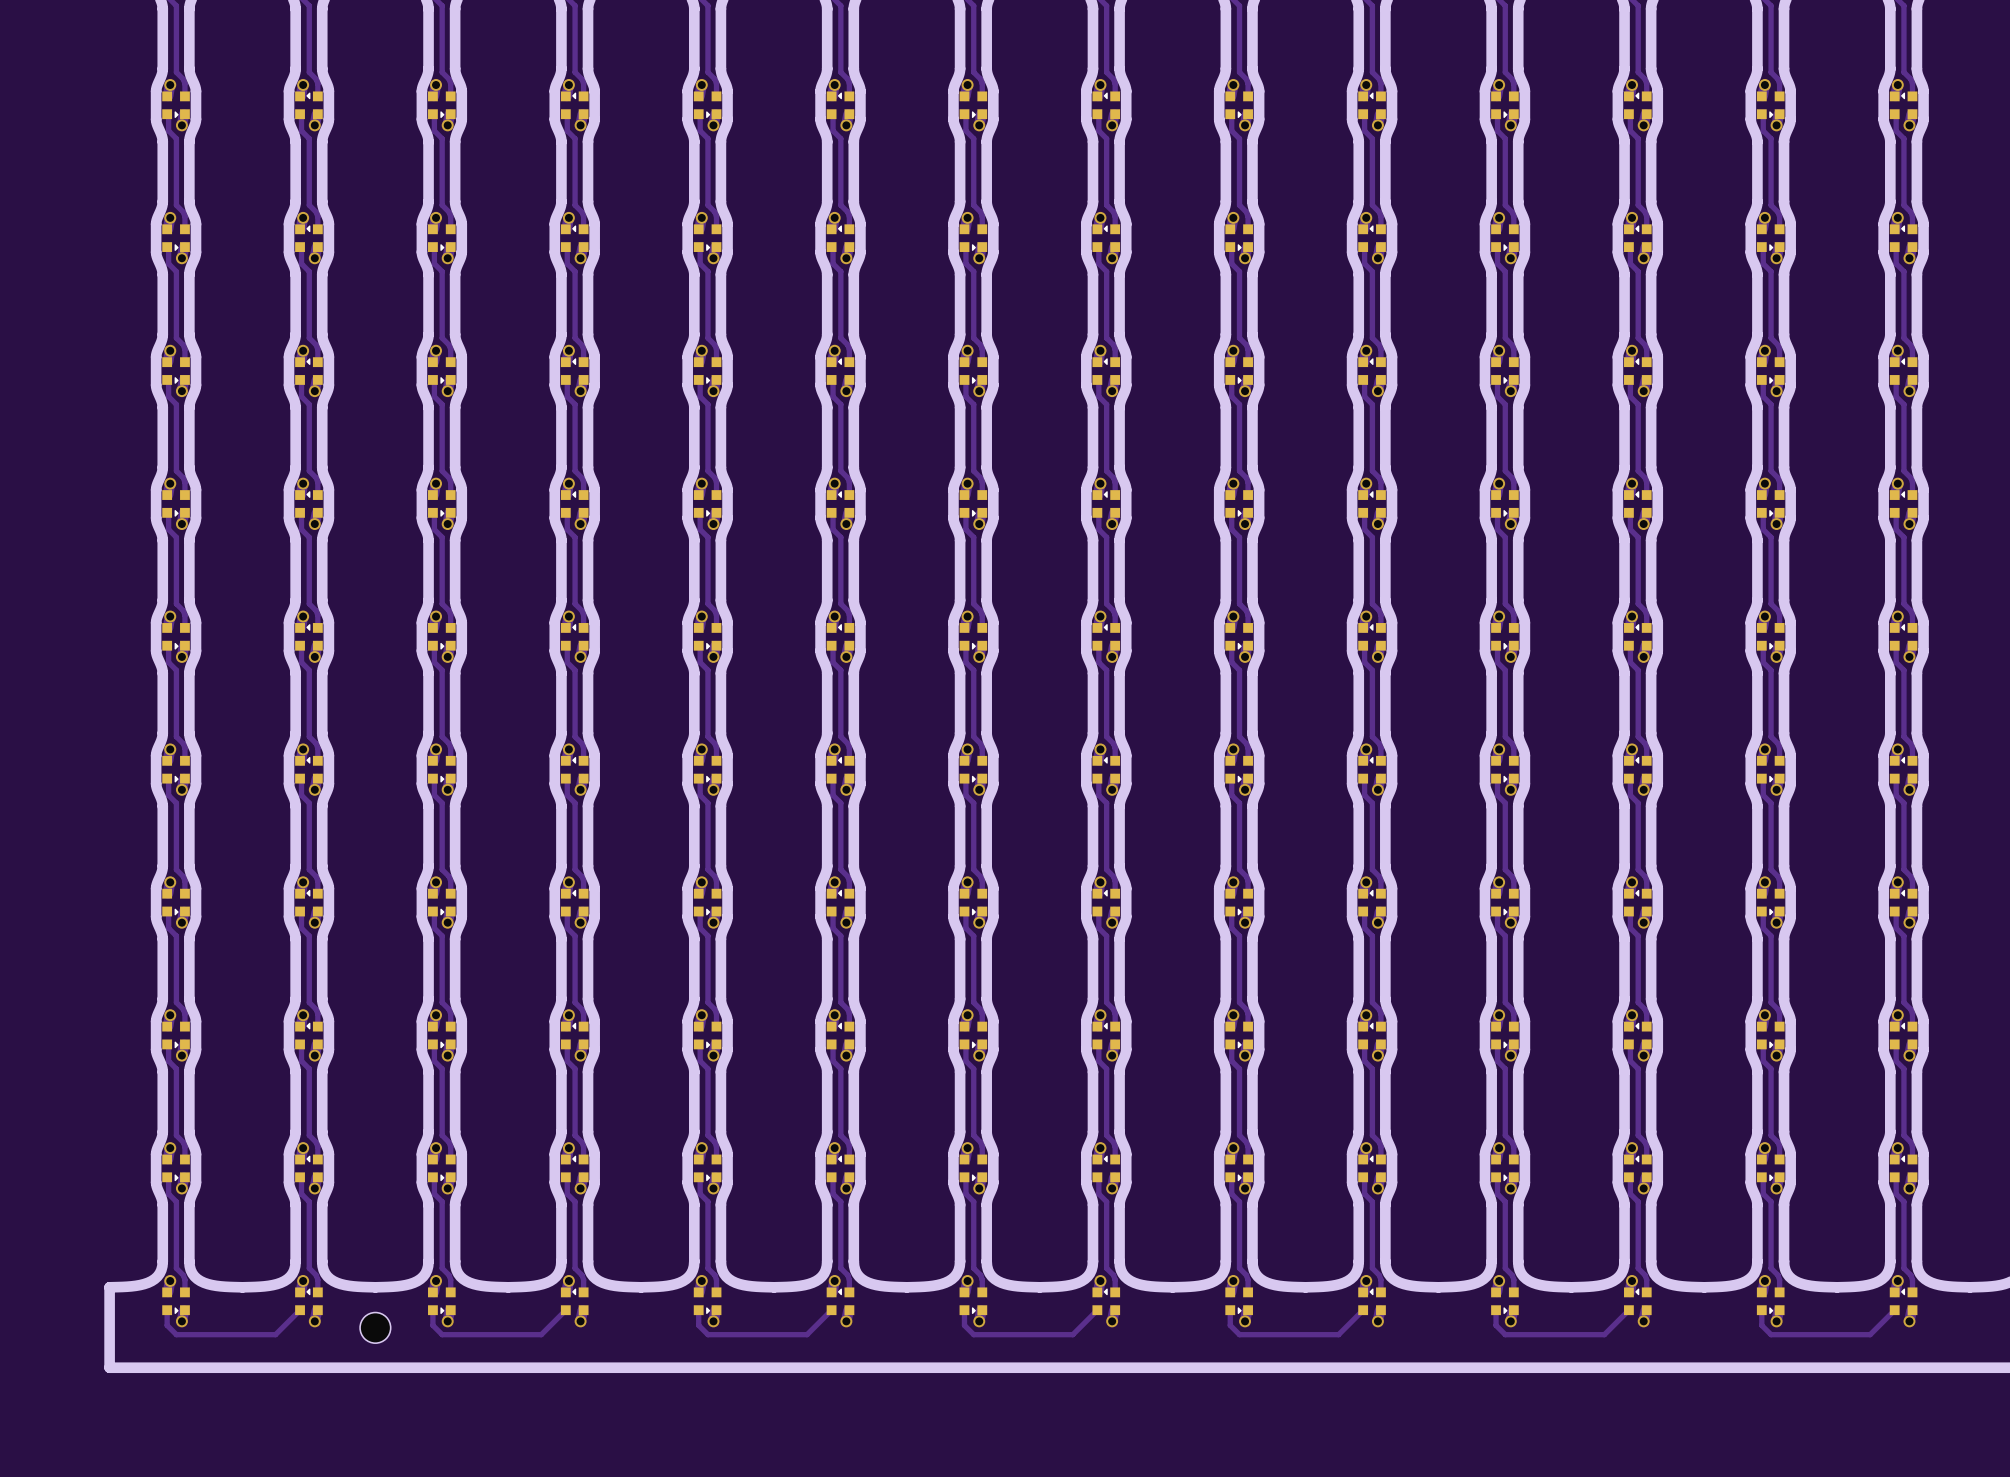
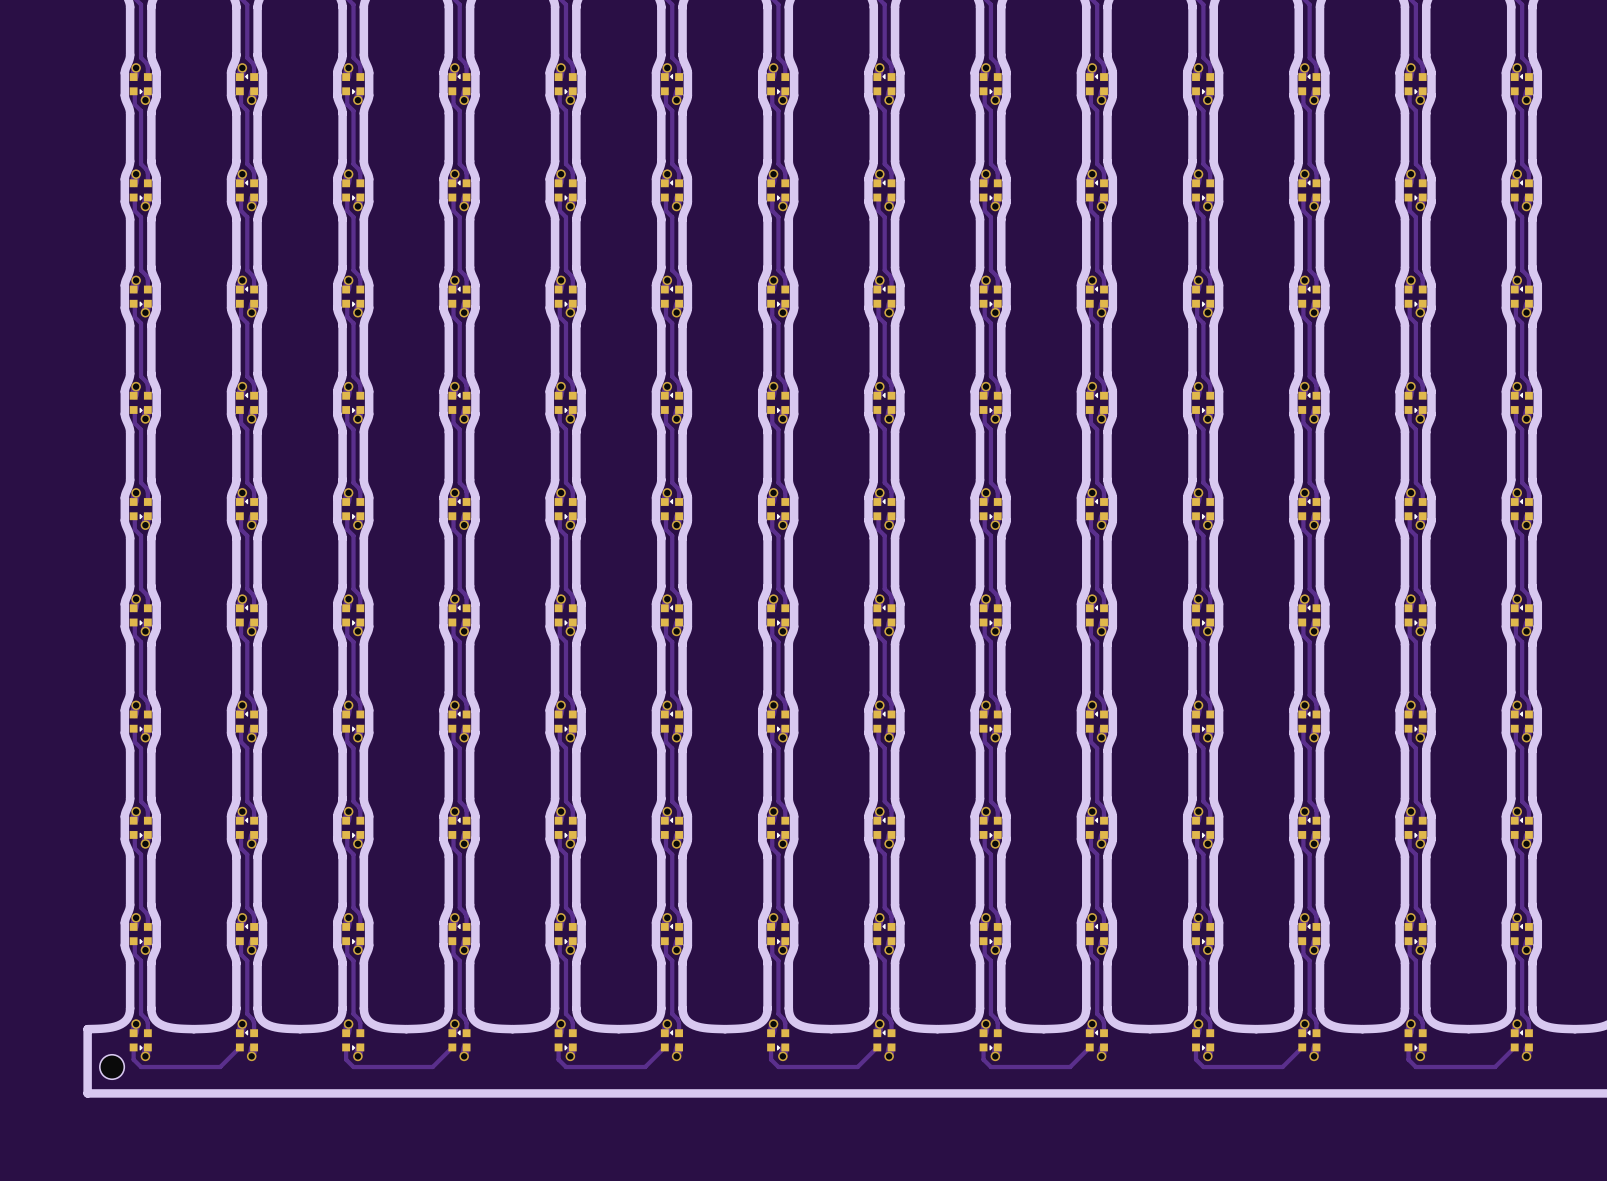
part position: (375, 1327) -> (112, 1067)

